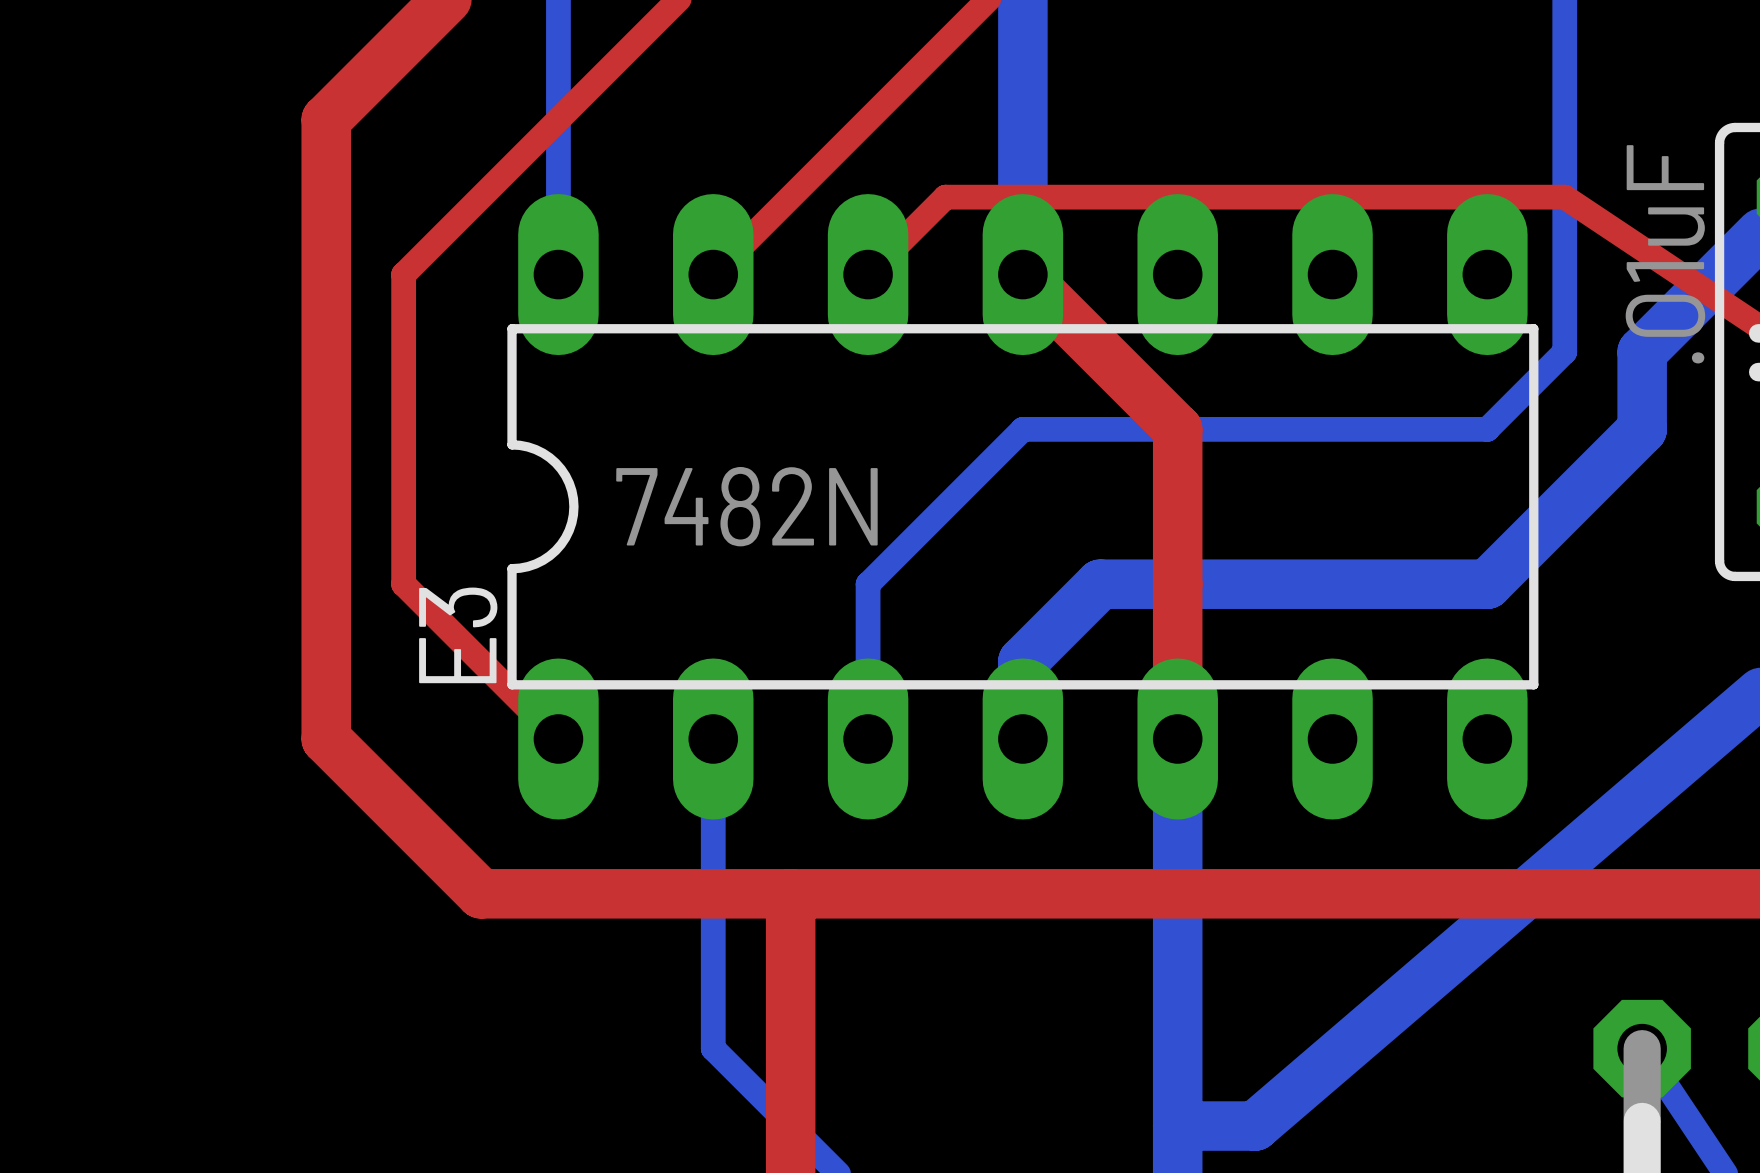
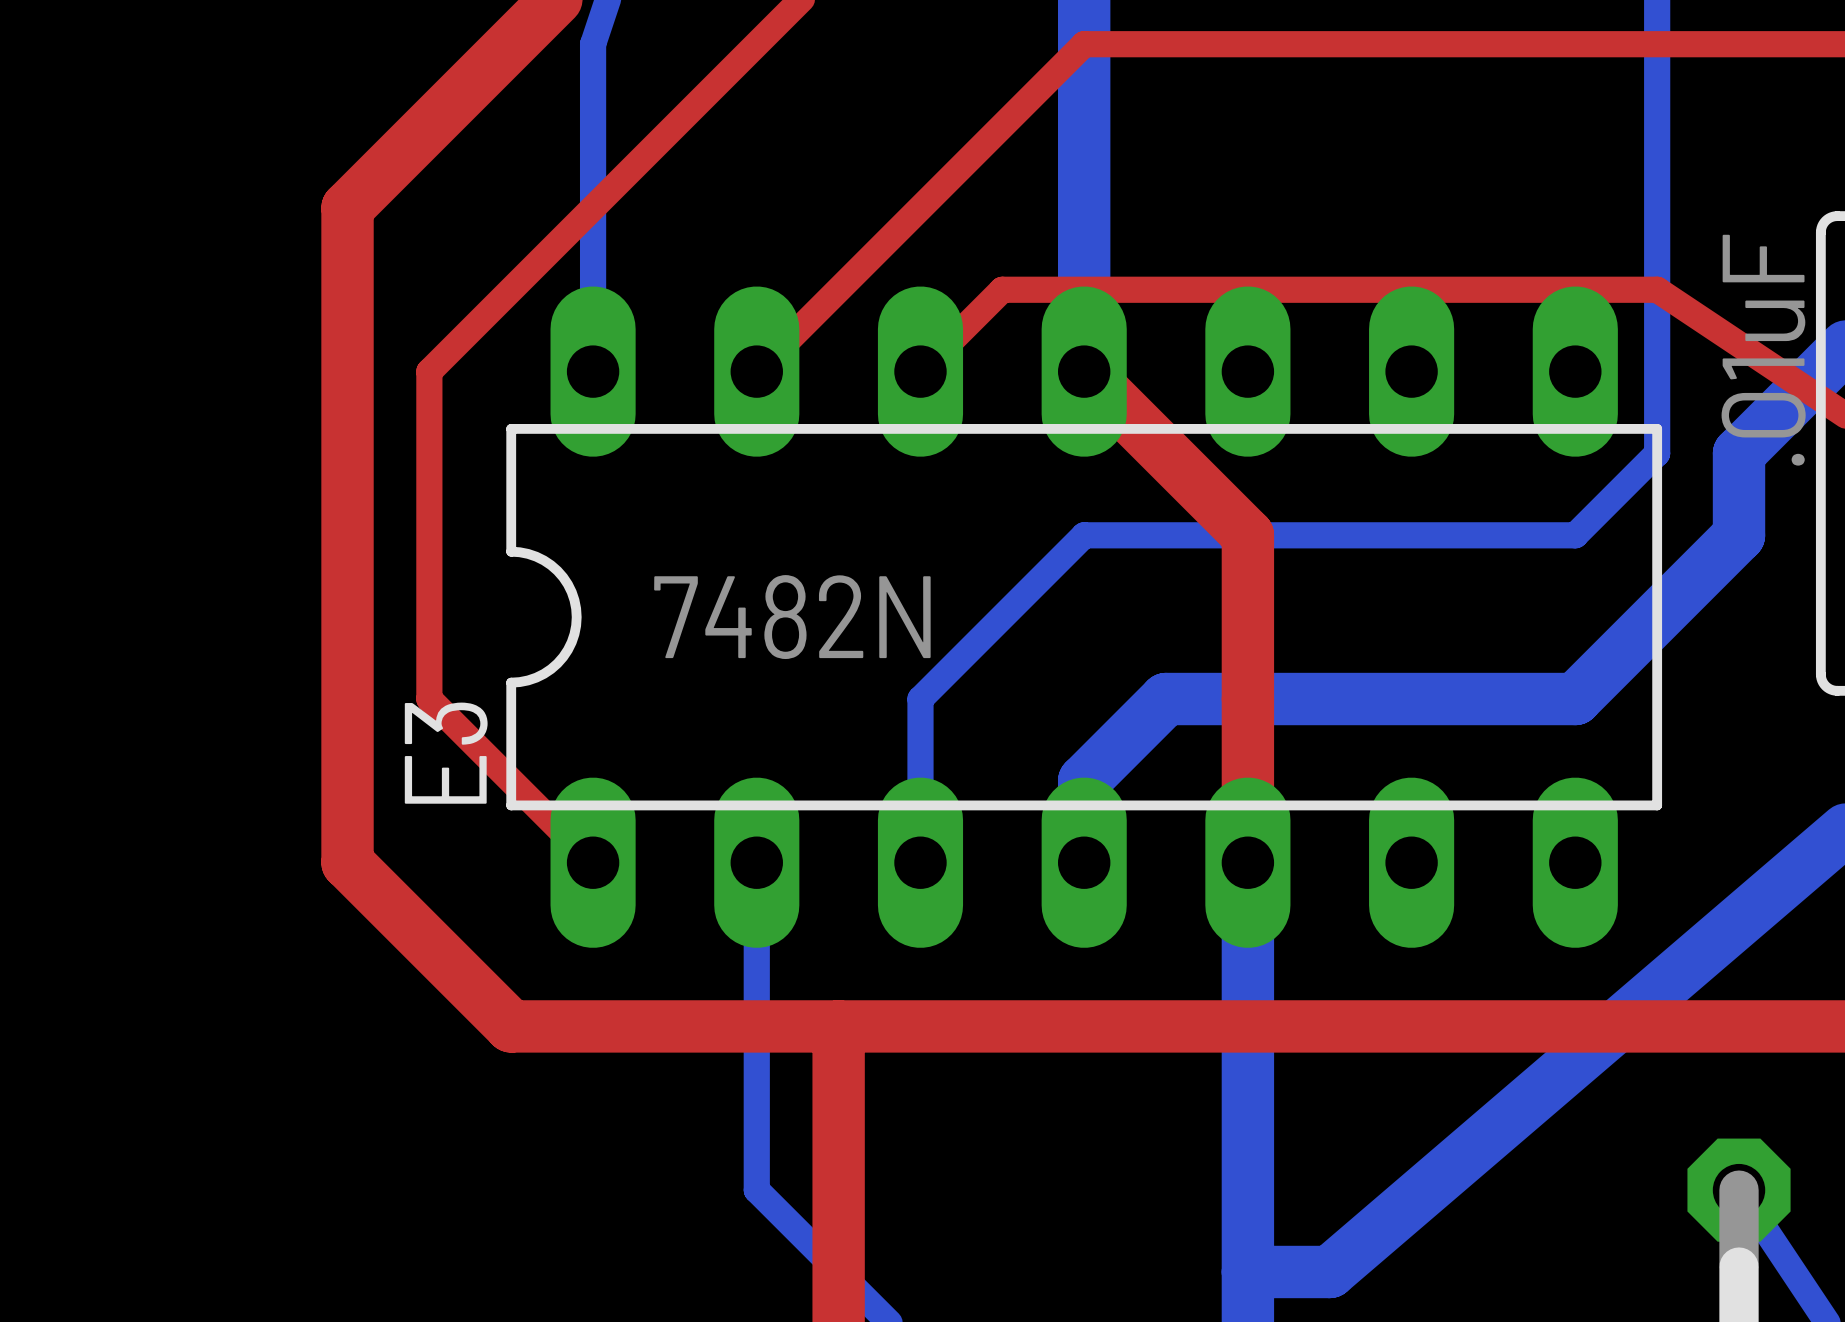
E3 footprint: [507, 194, 1539, 820] -> [506, 286, 1663, 948]
E3 name position: E3 (458, 635) -> E3 (446, 753)

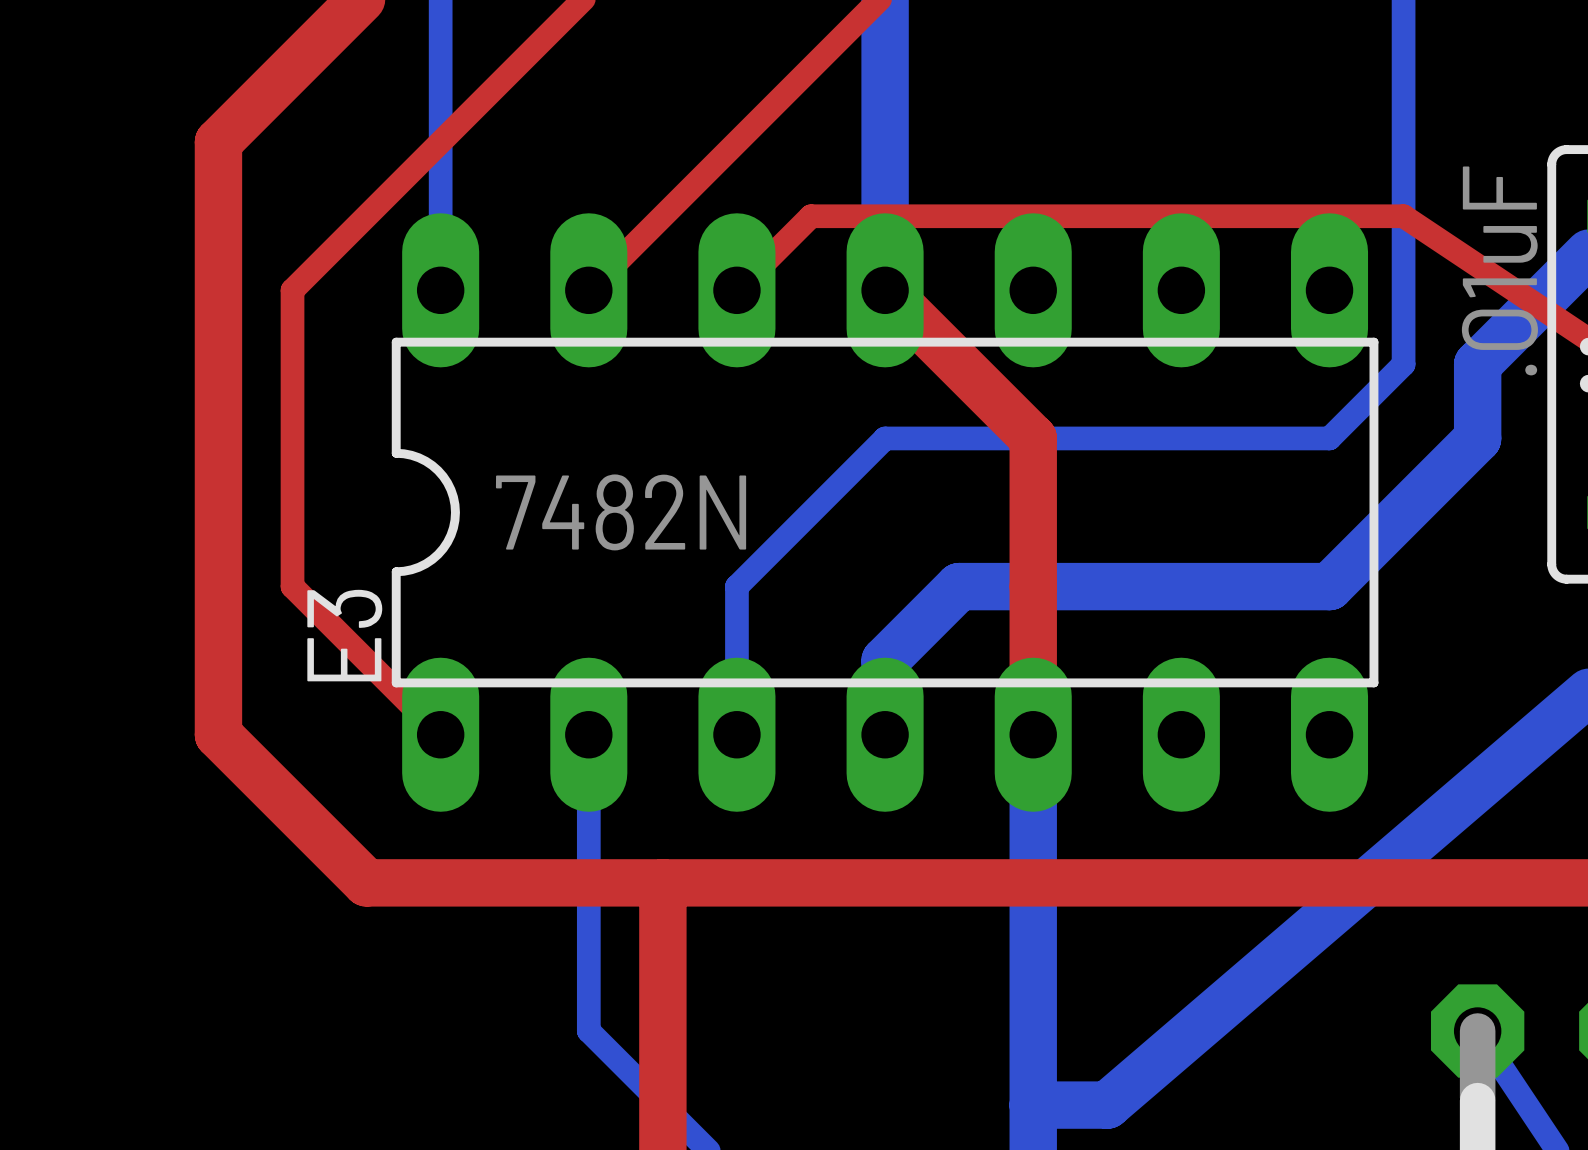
E3 footprint: [506, 286, 1663, 948] -> [391, 213, 1379, 812]
E3 name position: E3 (446, 753) -> E3 (344, 635)

